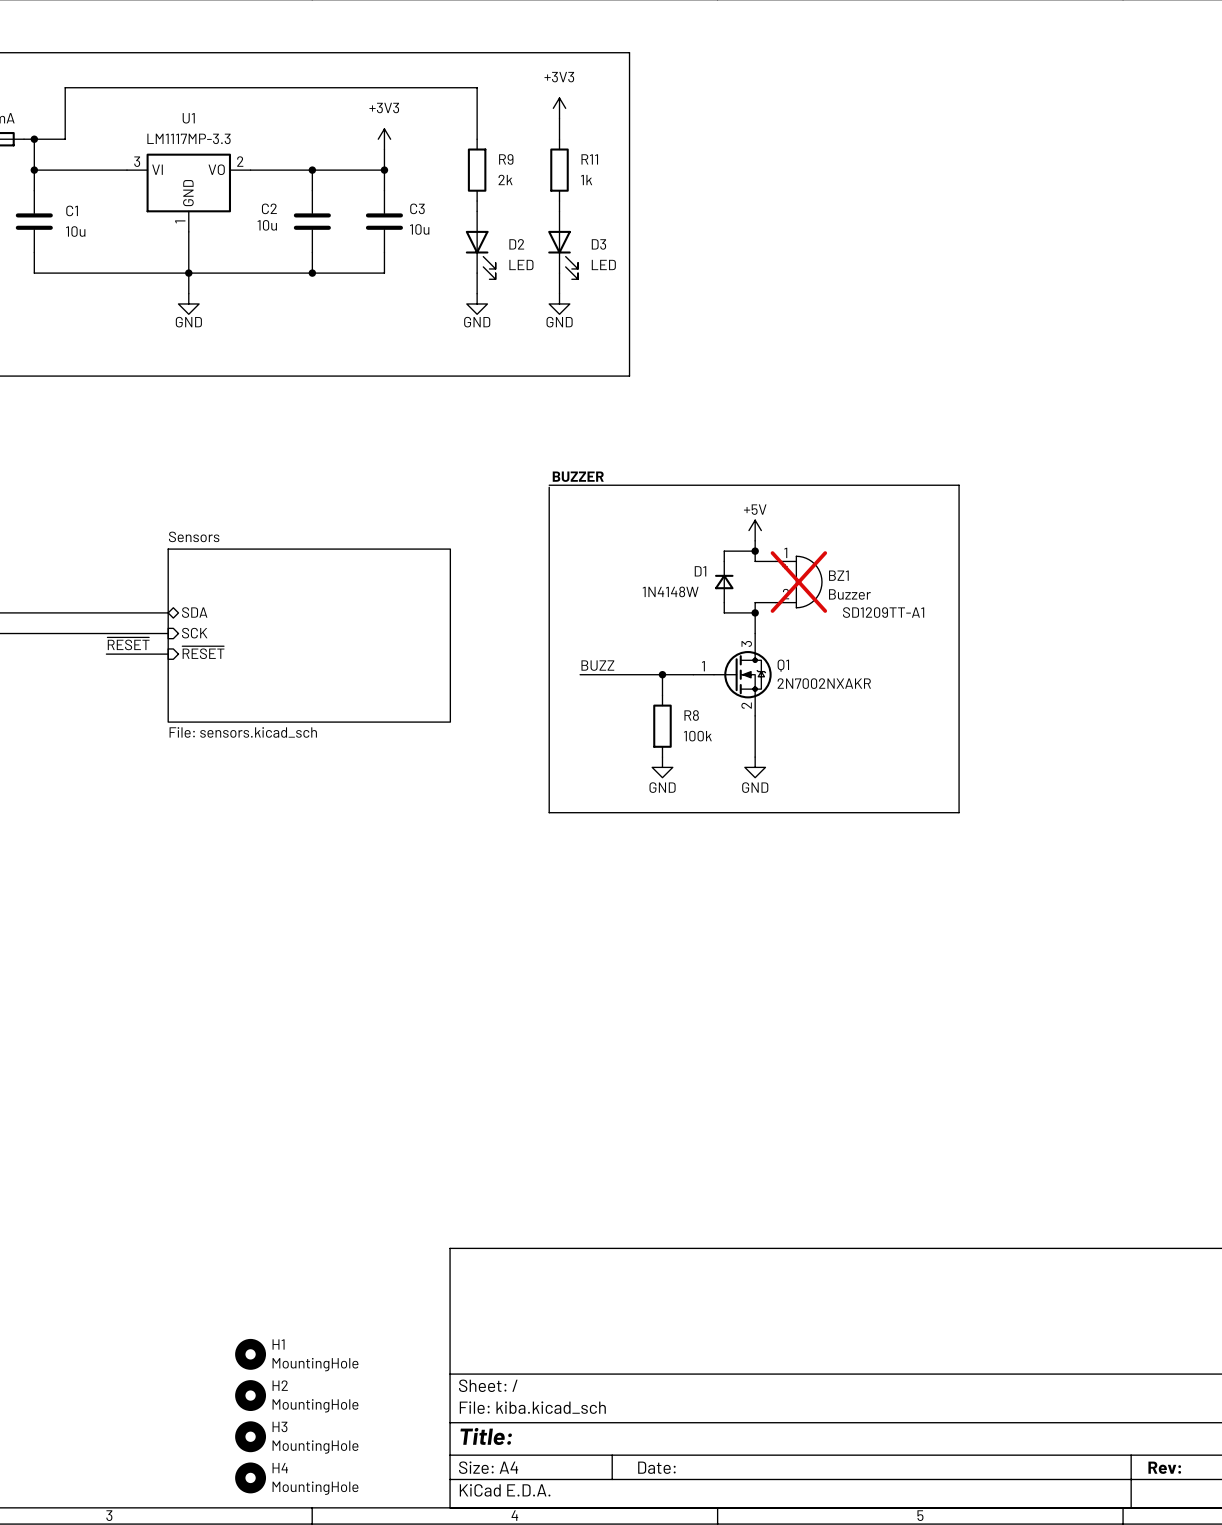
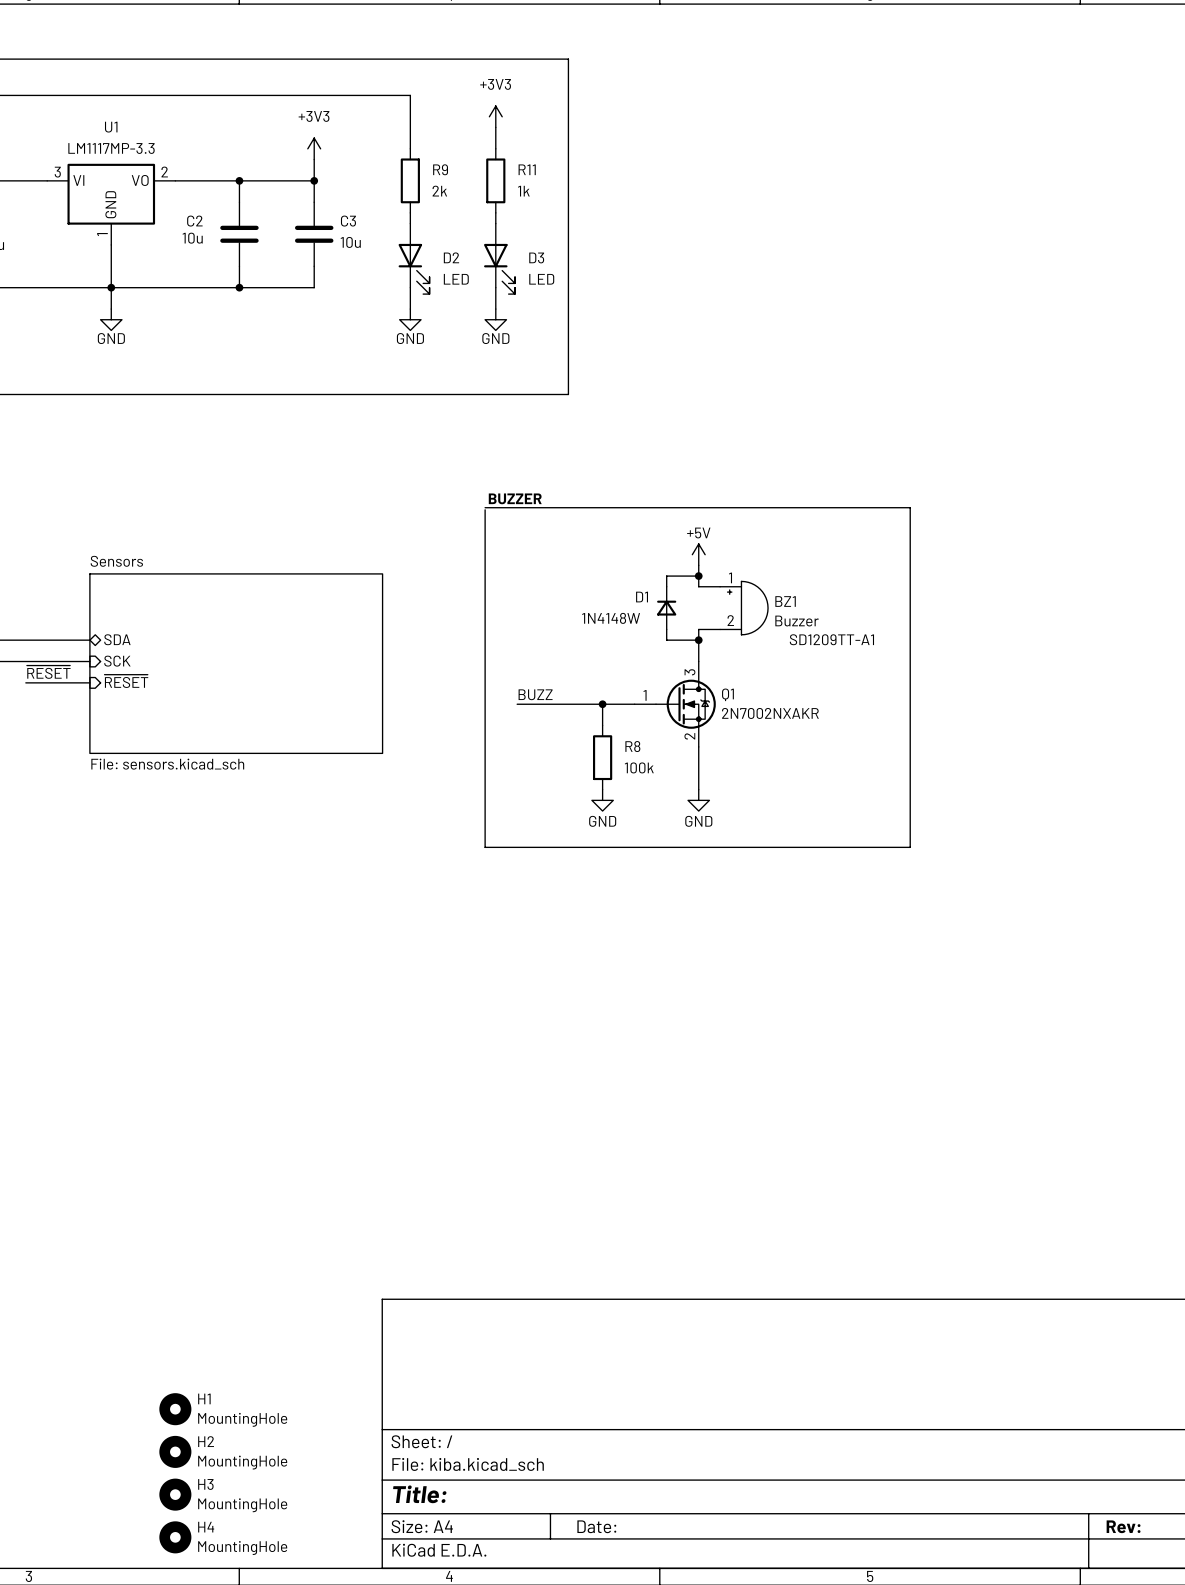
BZ1 do-not-place cross: (798, 582) -> none

